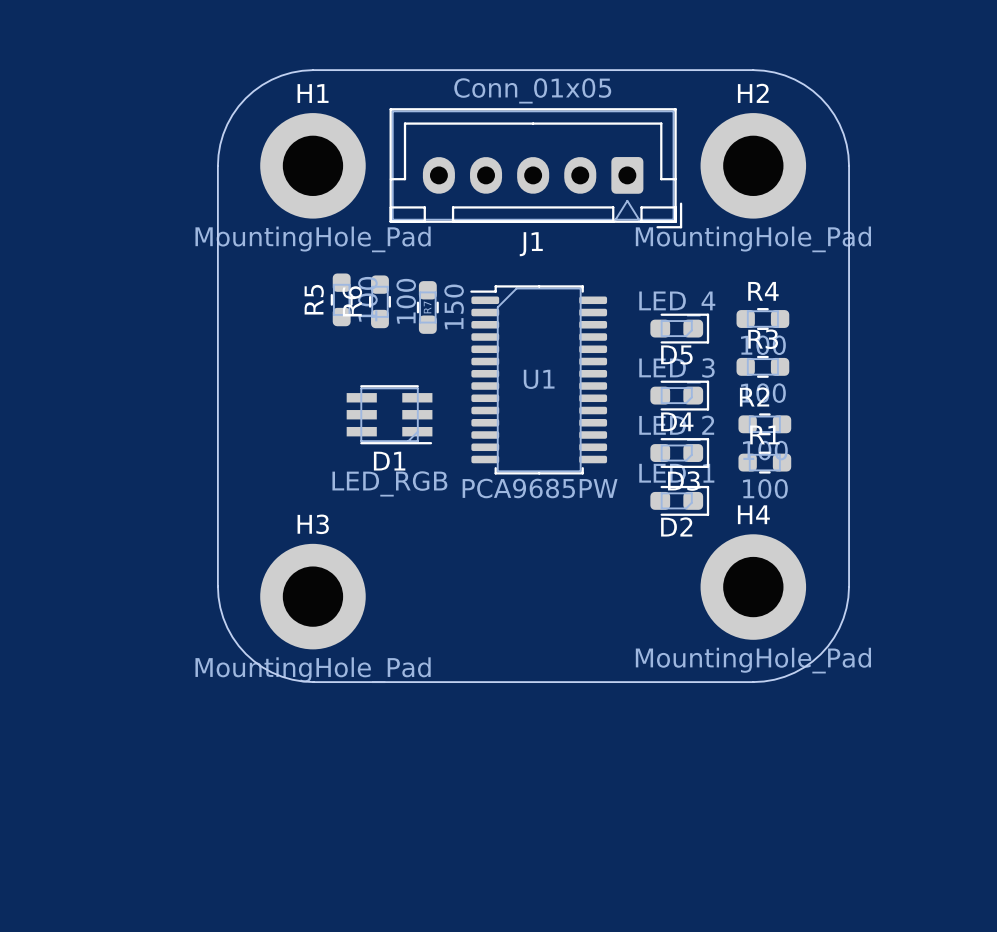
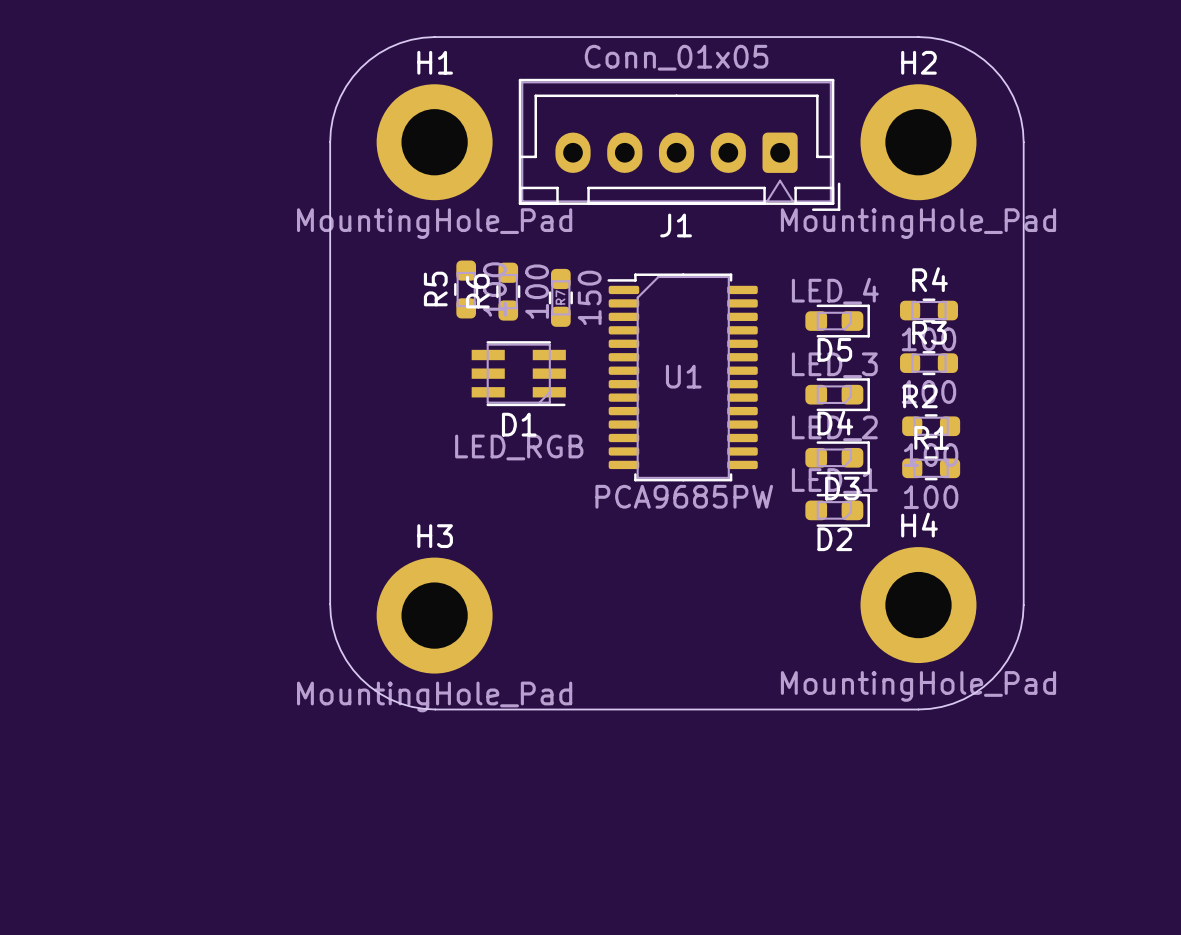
D1 position: (389, 414) -> (518, 373)

